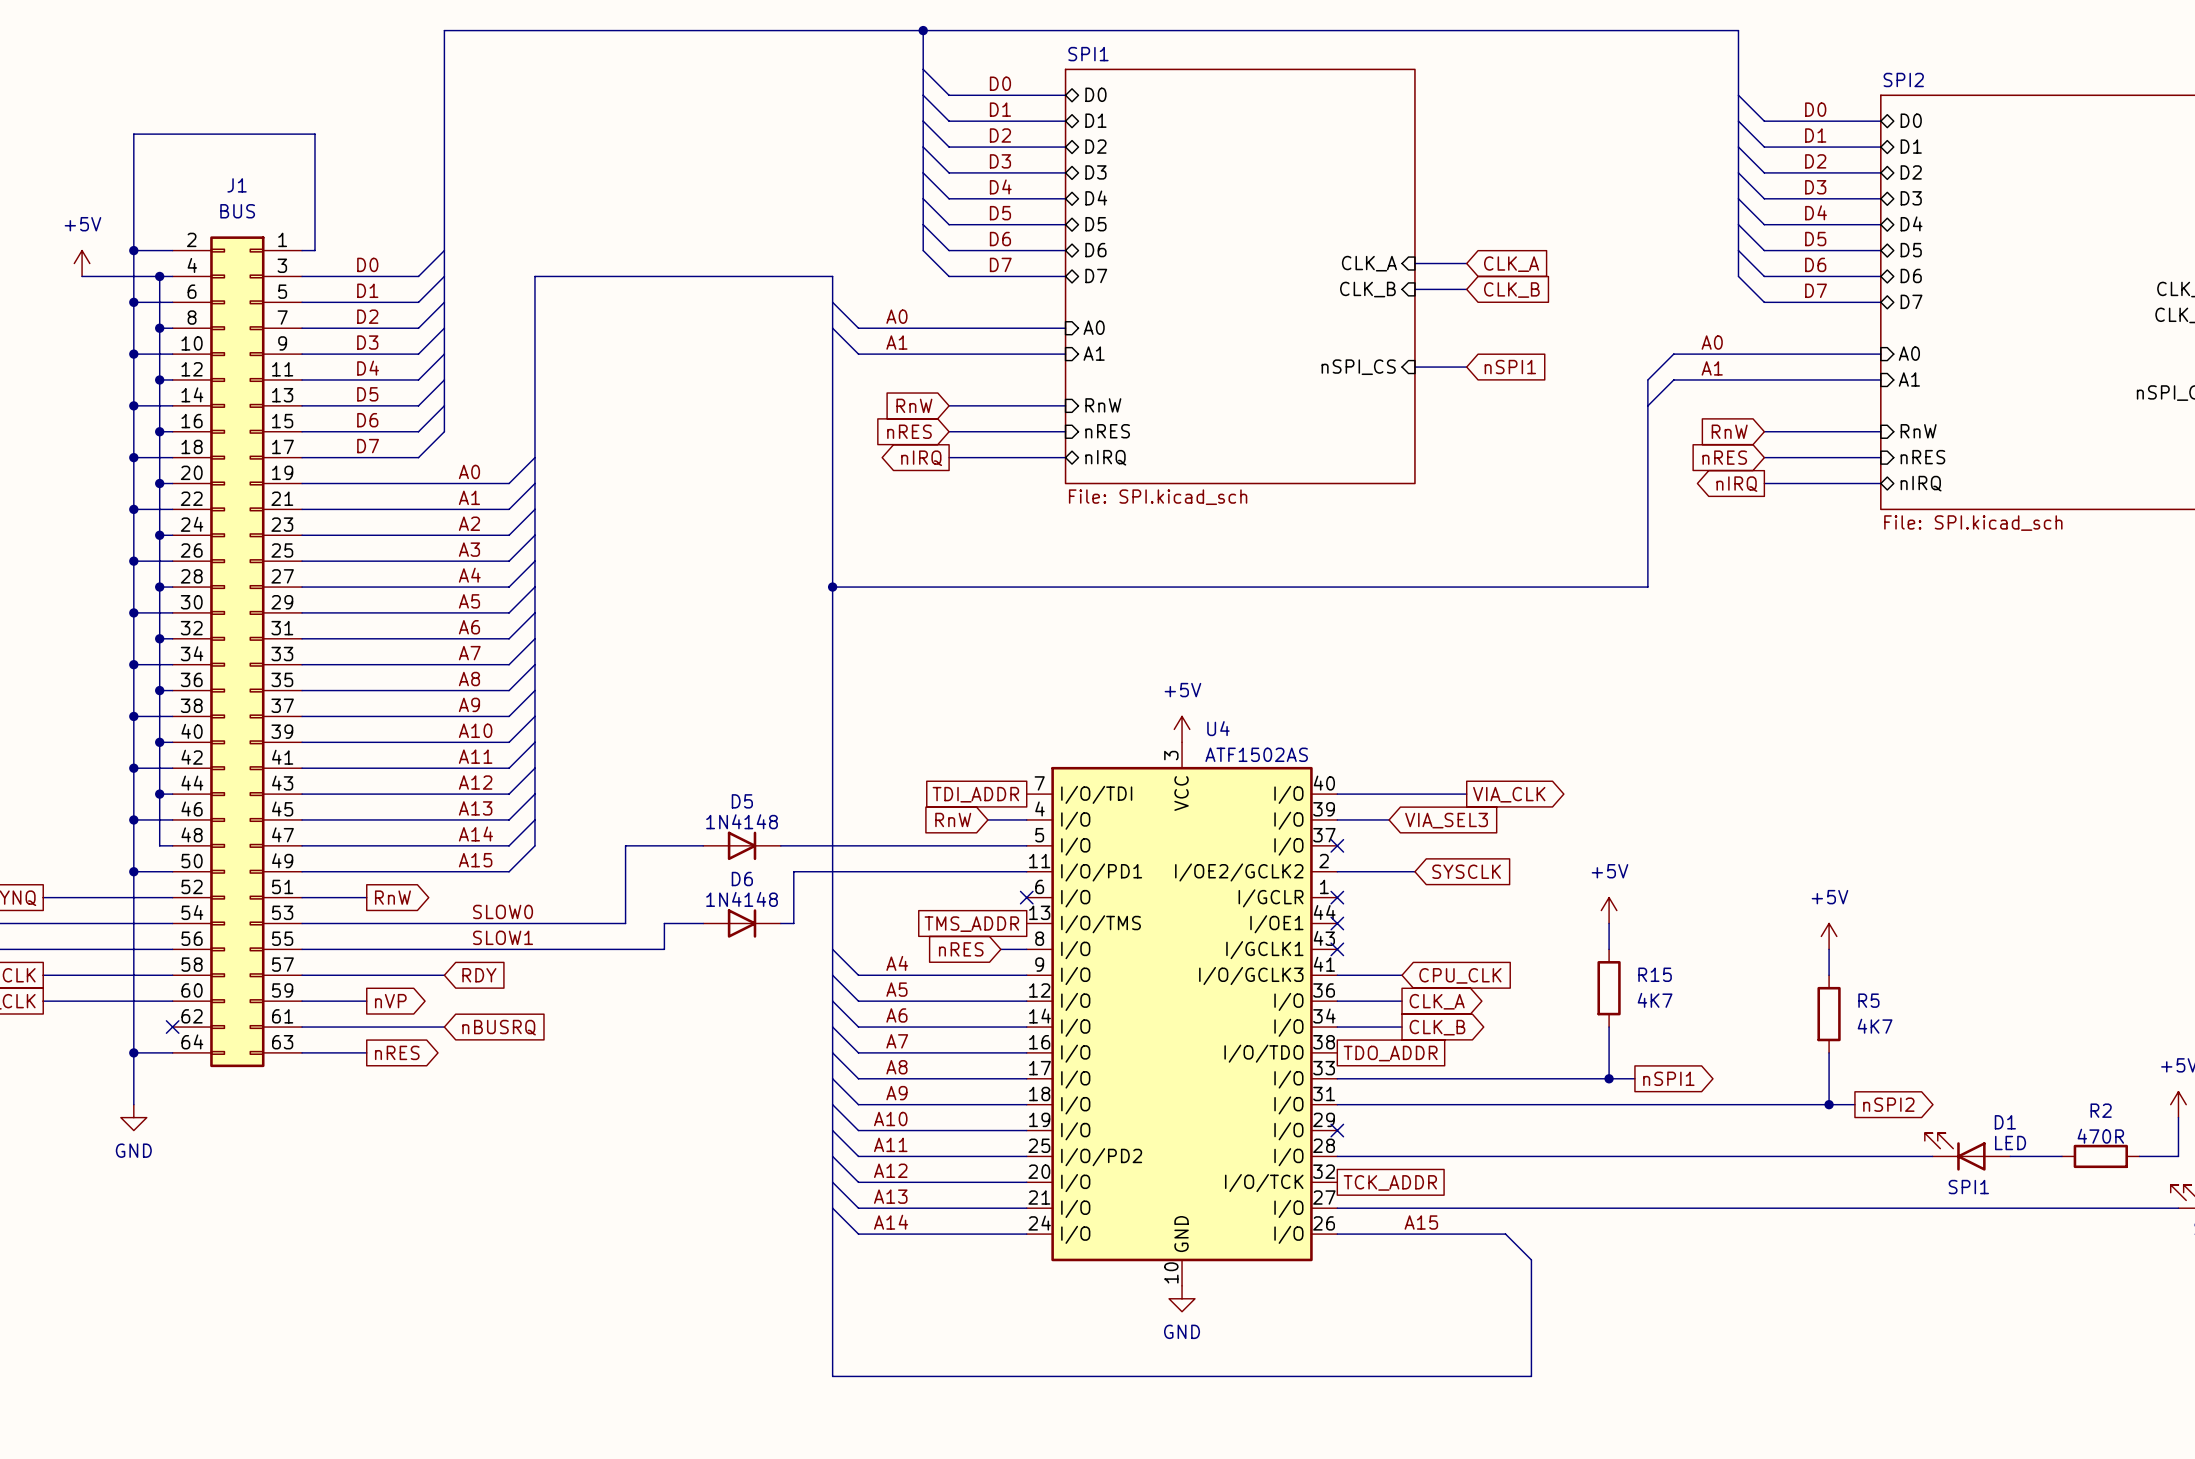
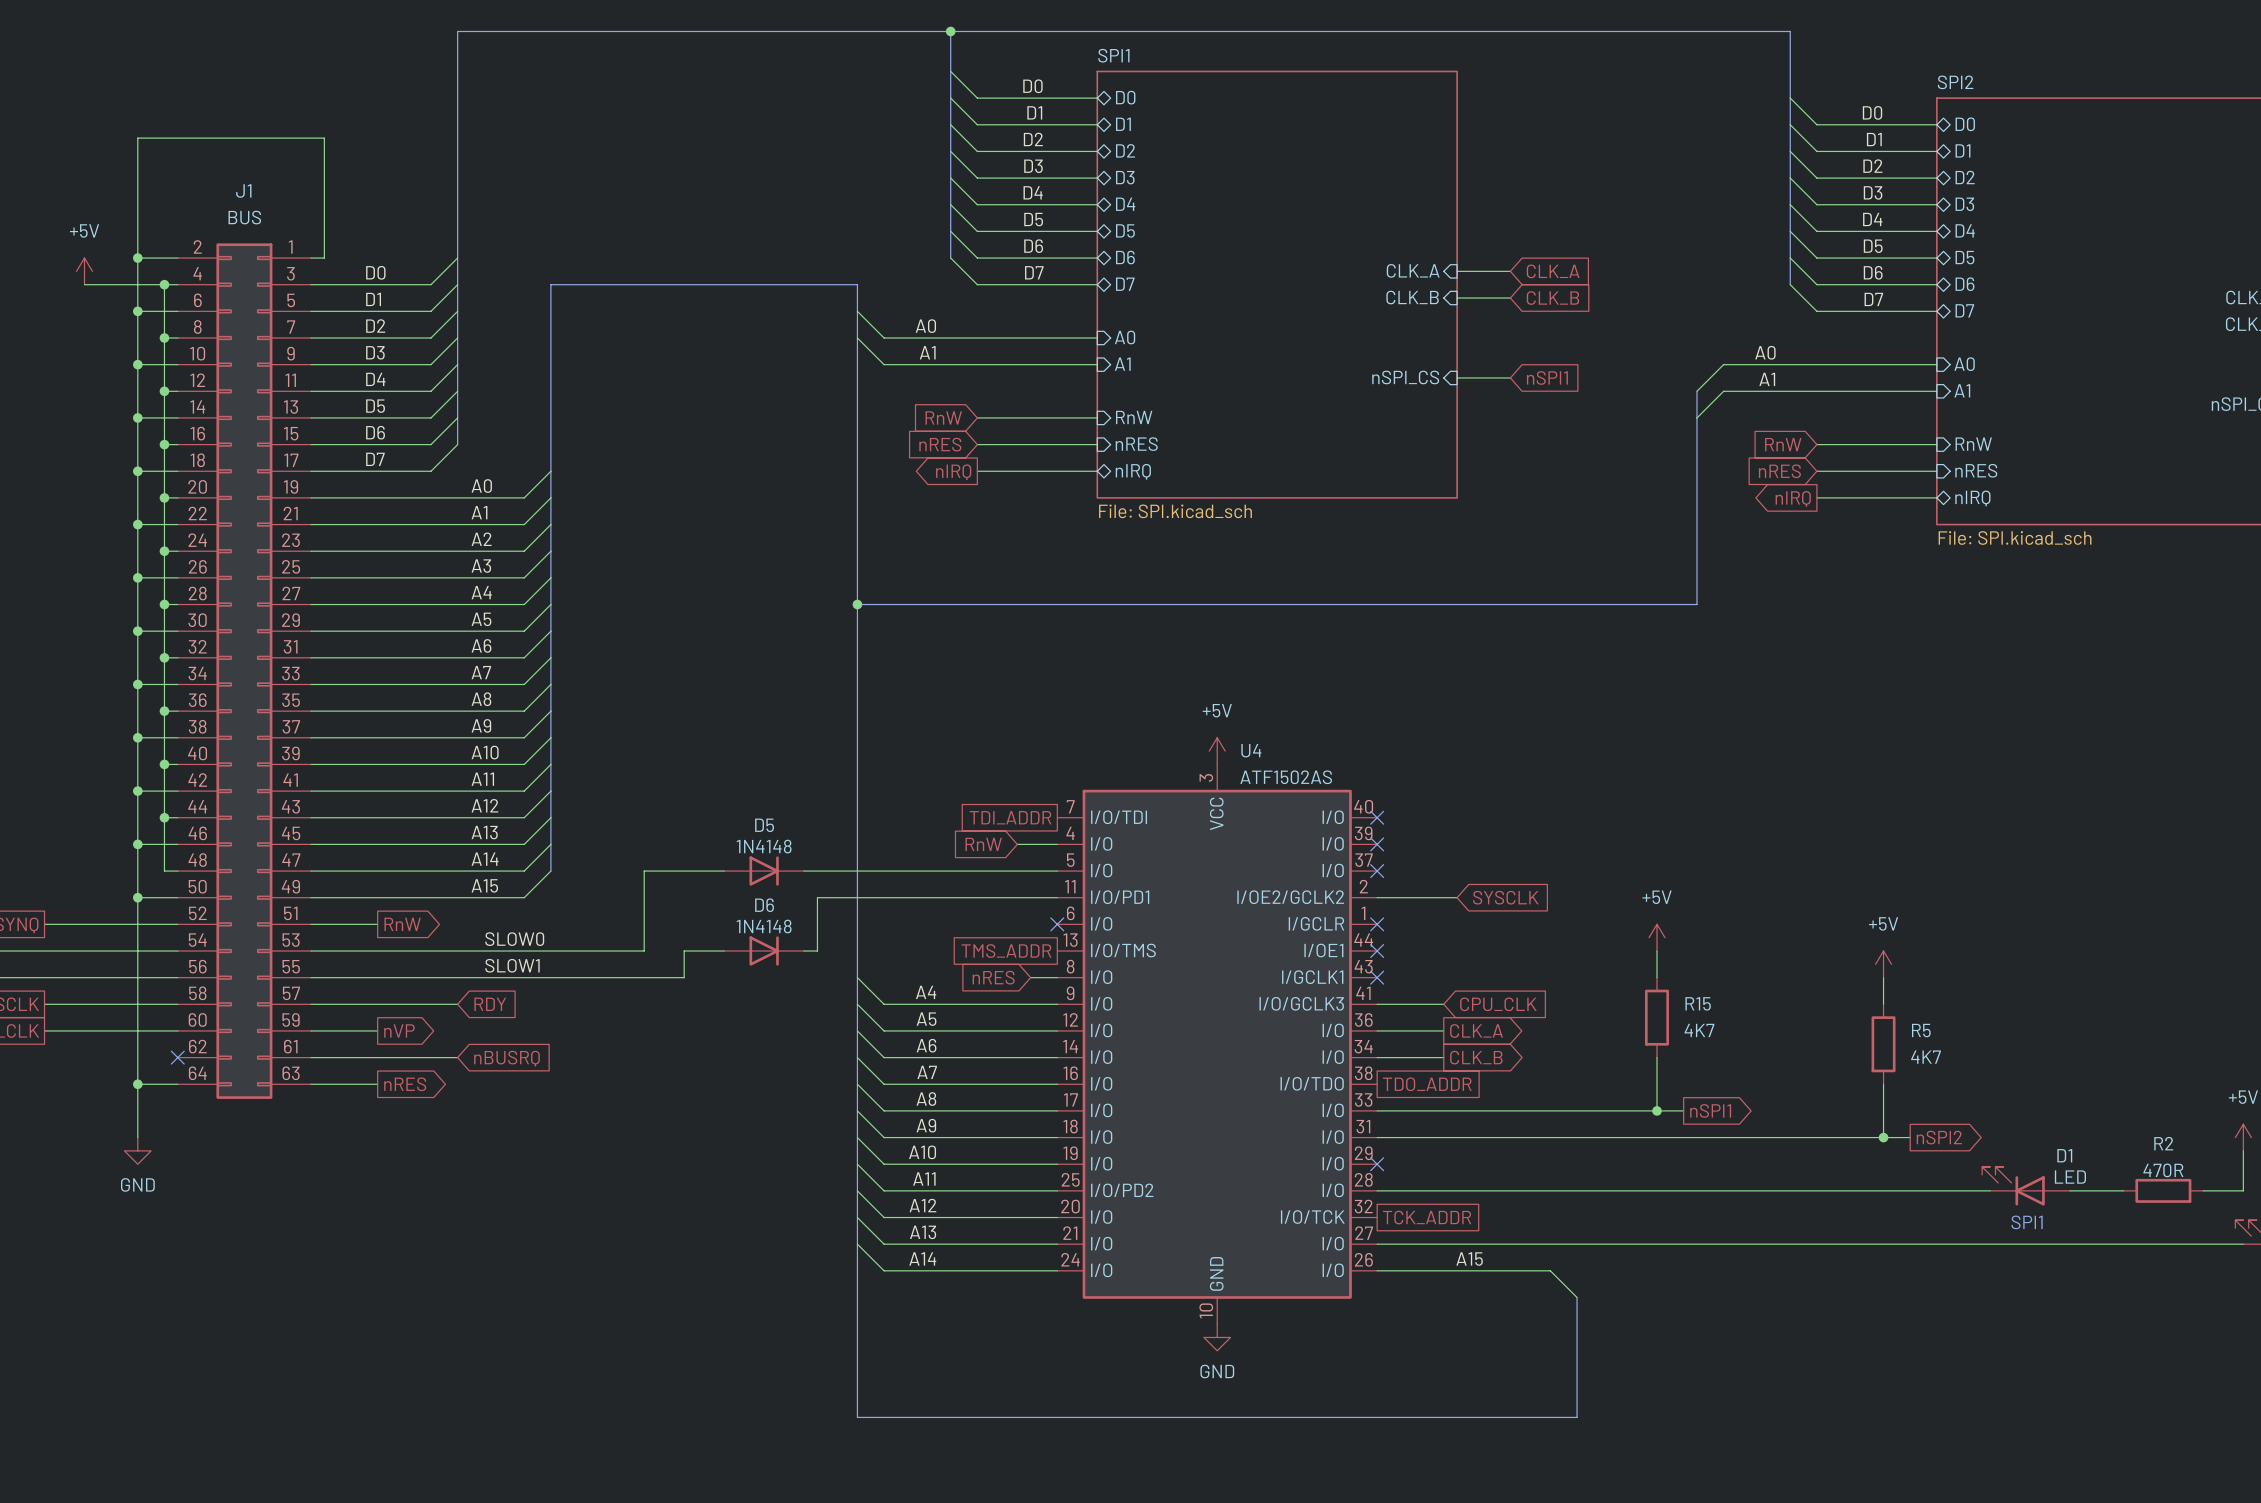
wire: (1337, 794) (1466, 794) -> none
no-connect mark: none -> (1377, 817)
global label: VIA_CLK (1509, 794) -> none
wire: (1337, 819) (1389, 819) -> none
no-connect mark: none -> (1377, 844)
global label: VIA_SEL3 (1446, 820) -> none

